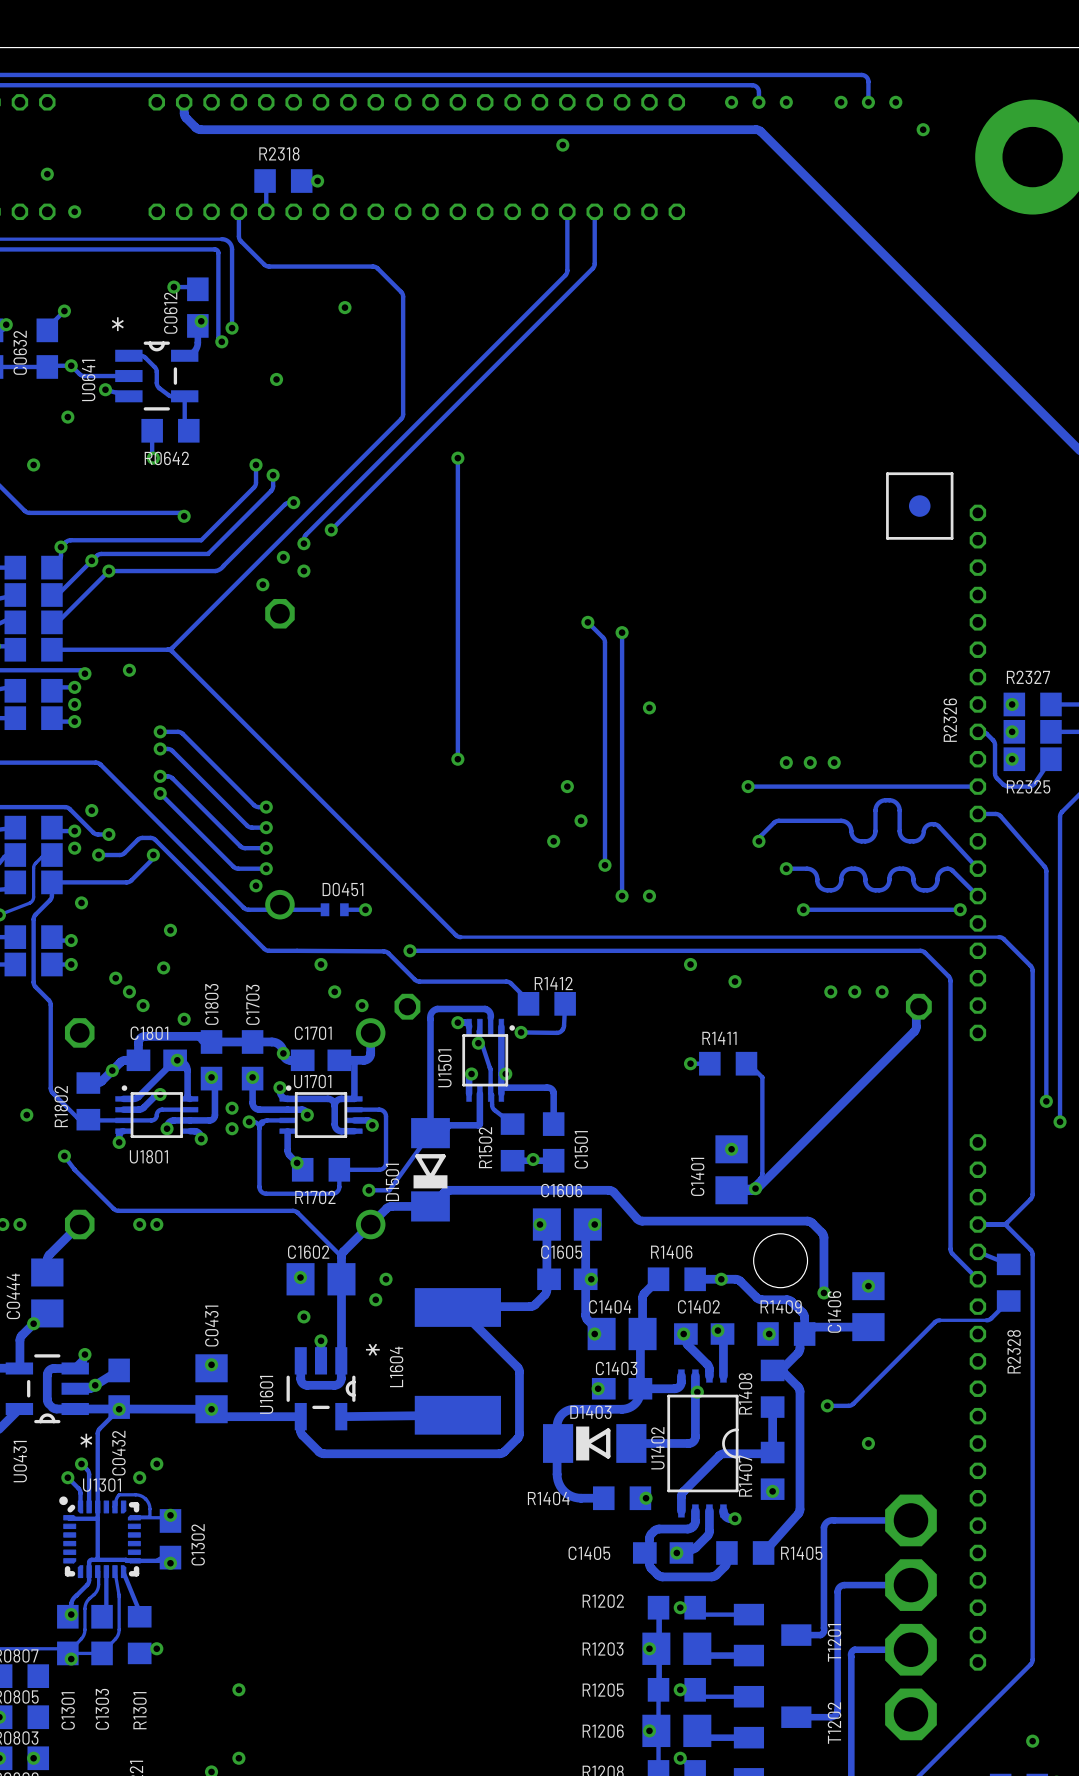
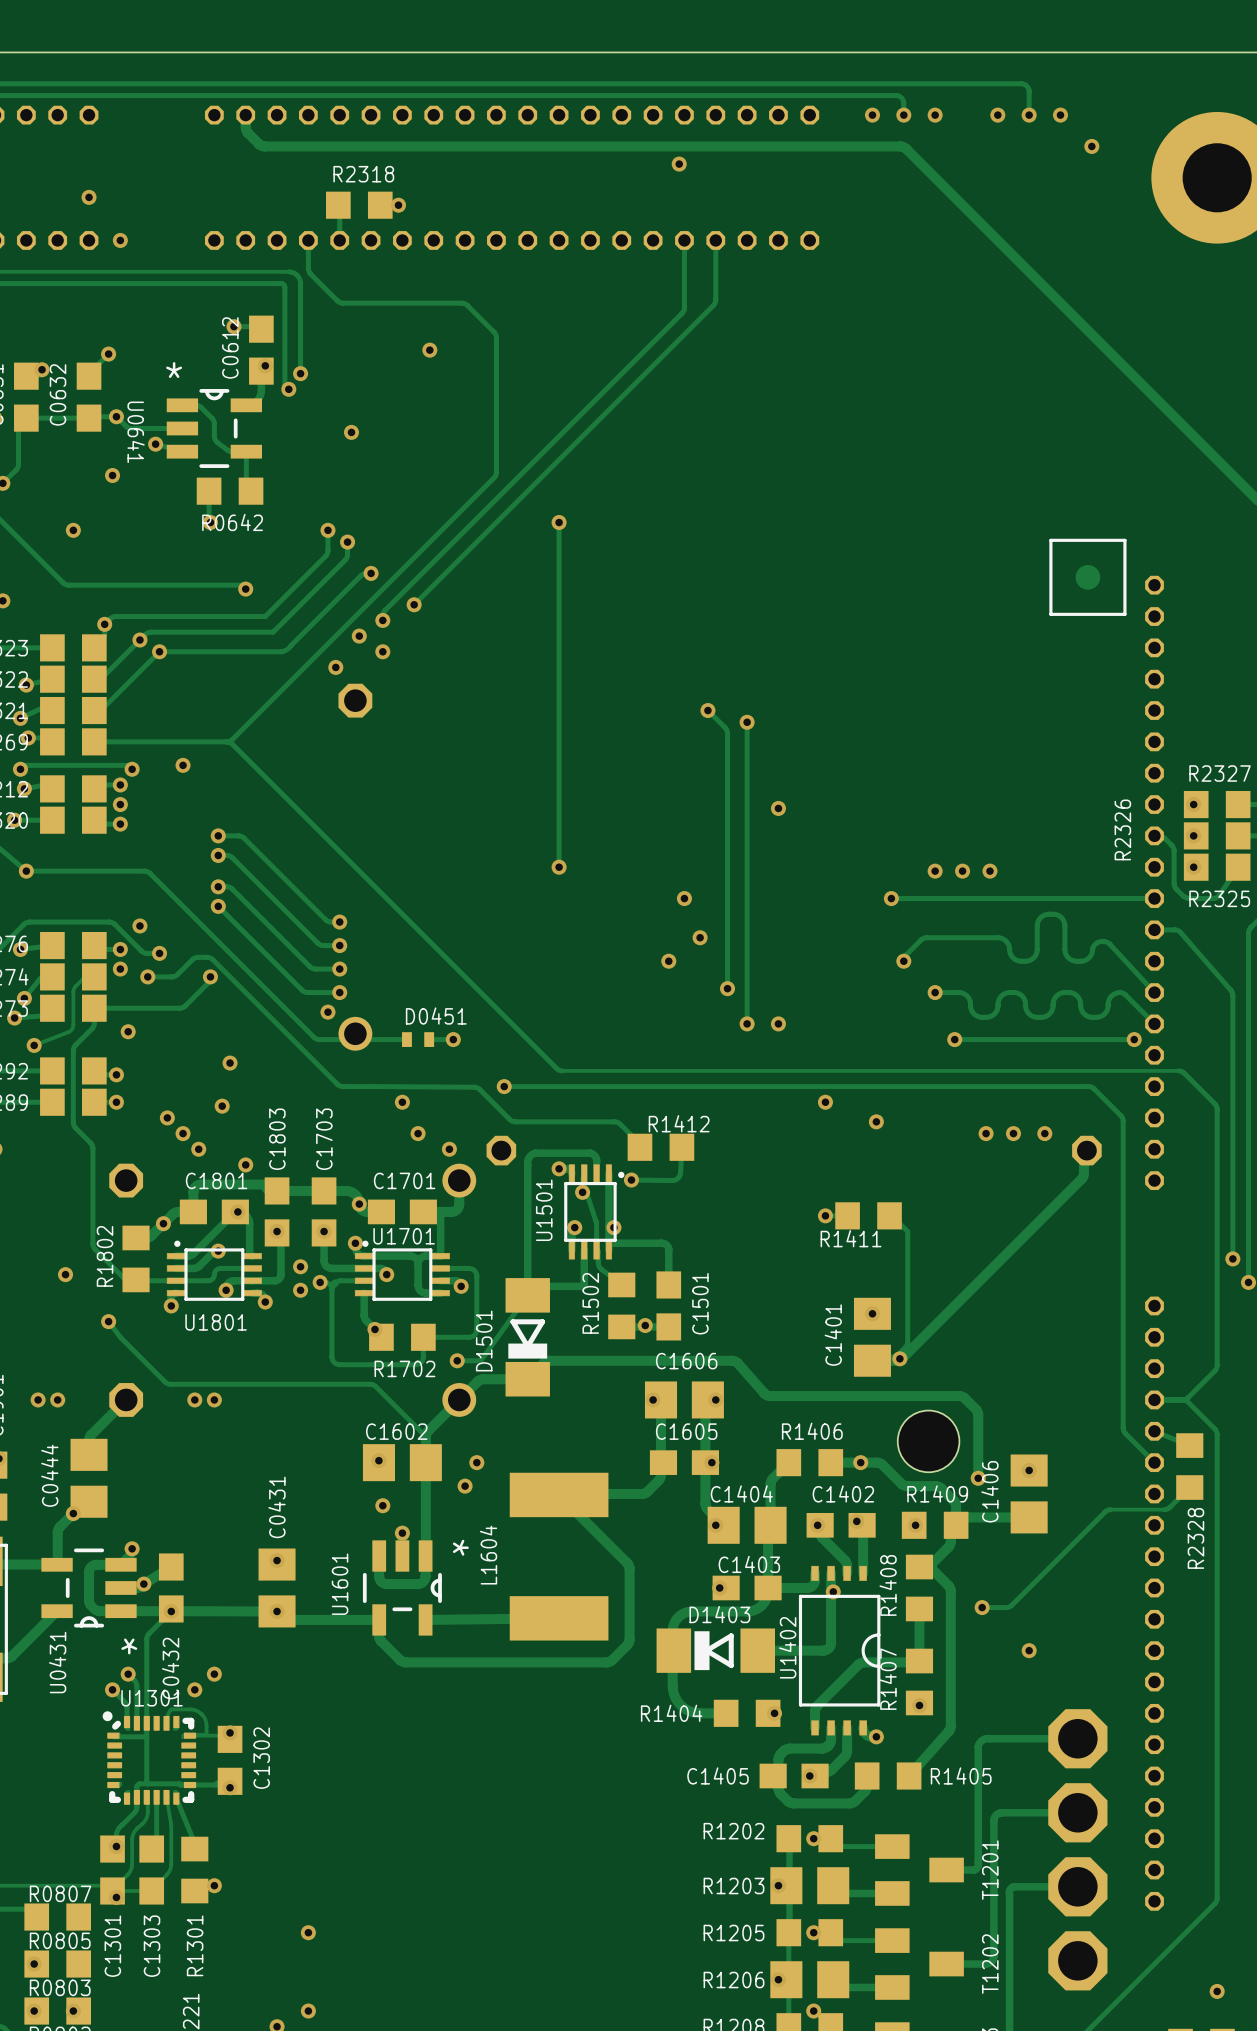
U0641 name rotation: 0° (88, 380) -> 180° (136, 432)
R1411 name position: R1411 (719, 1038) -> R1411 (851, 1238)

